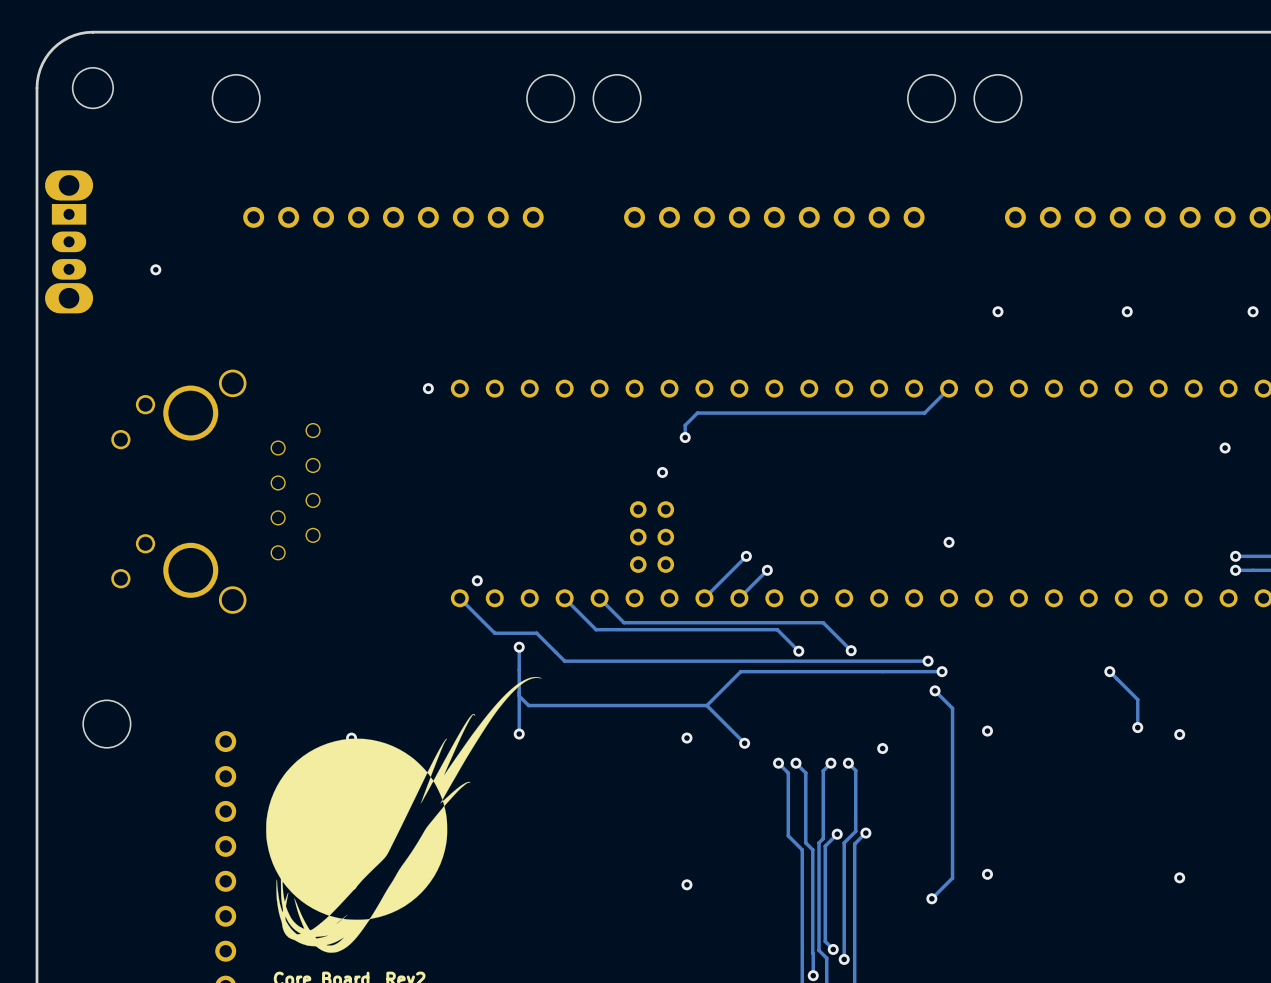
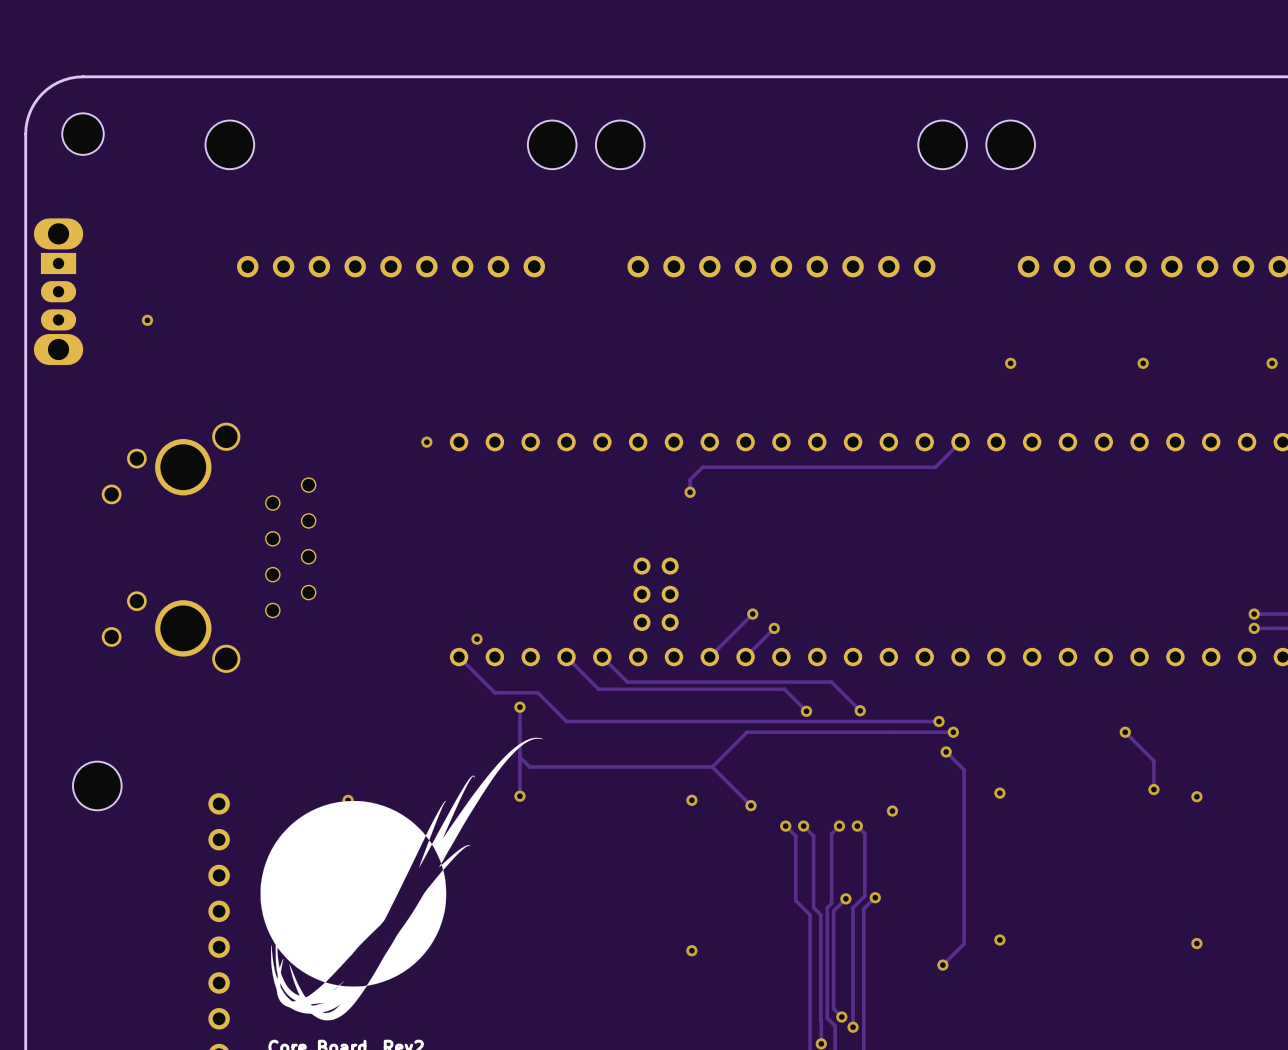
via: (1225, 448) -> none
via: (662, 472) -> none
via: (949, 542) -> none

